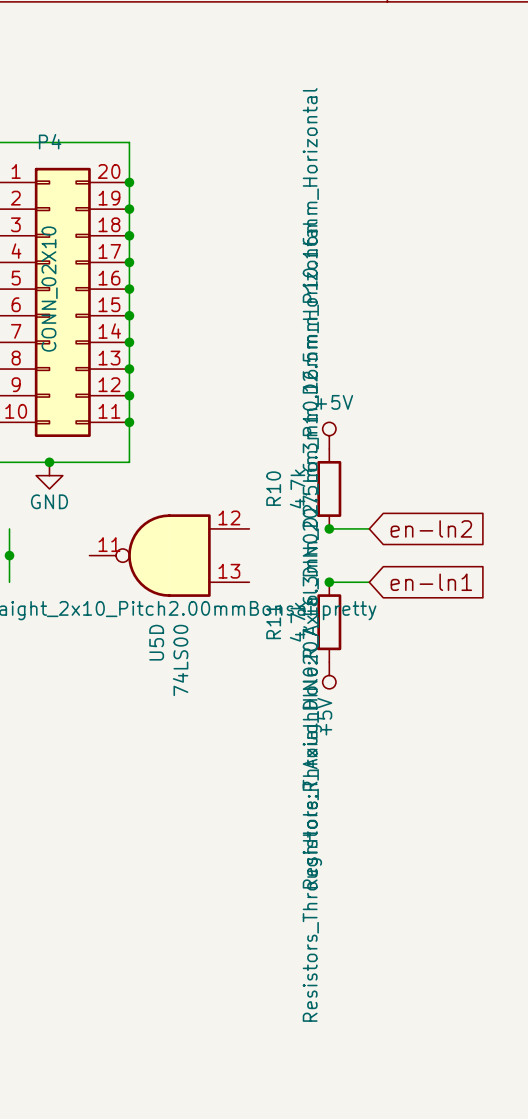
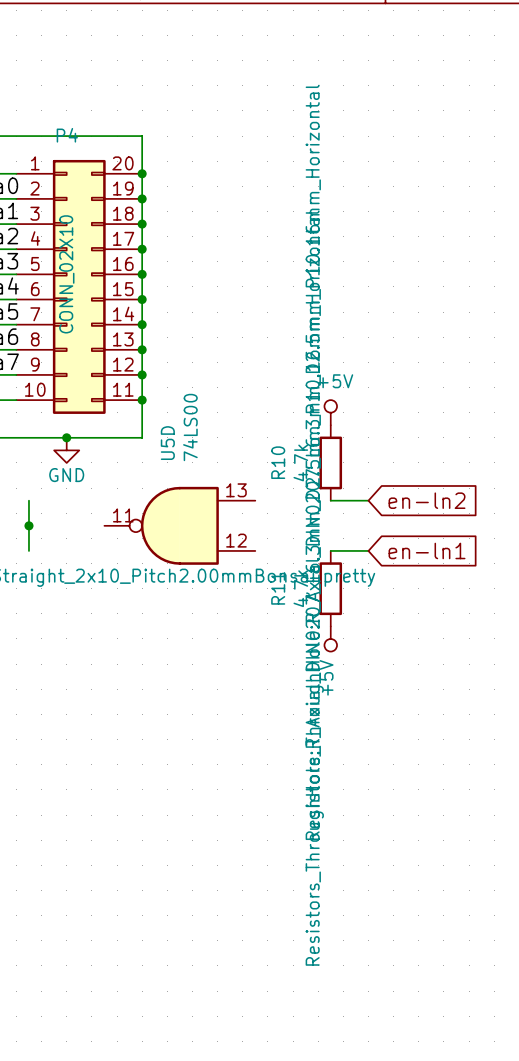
junction: (329, 528) -> none
U5D flip: as is (169, 555) -> up-down (179, 525)
junction: (329, 582) -> none

